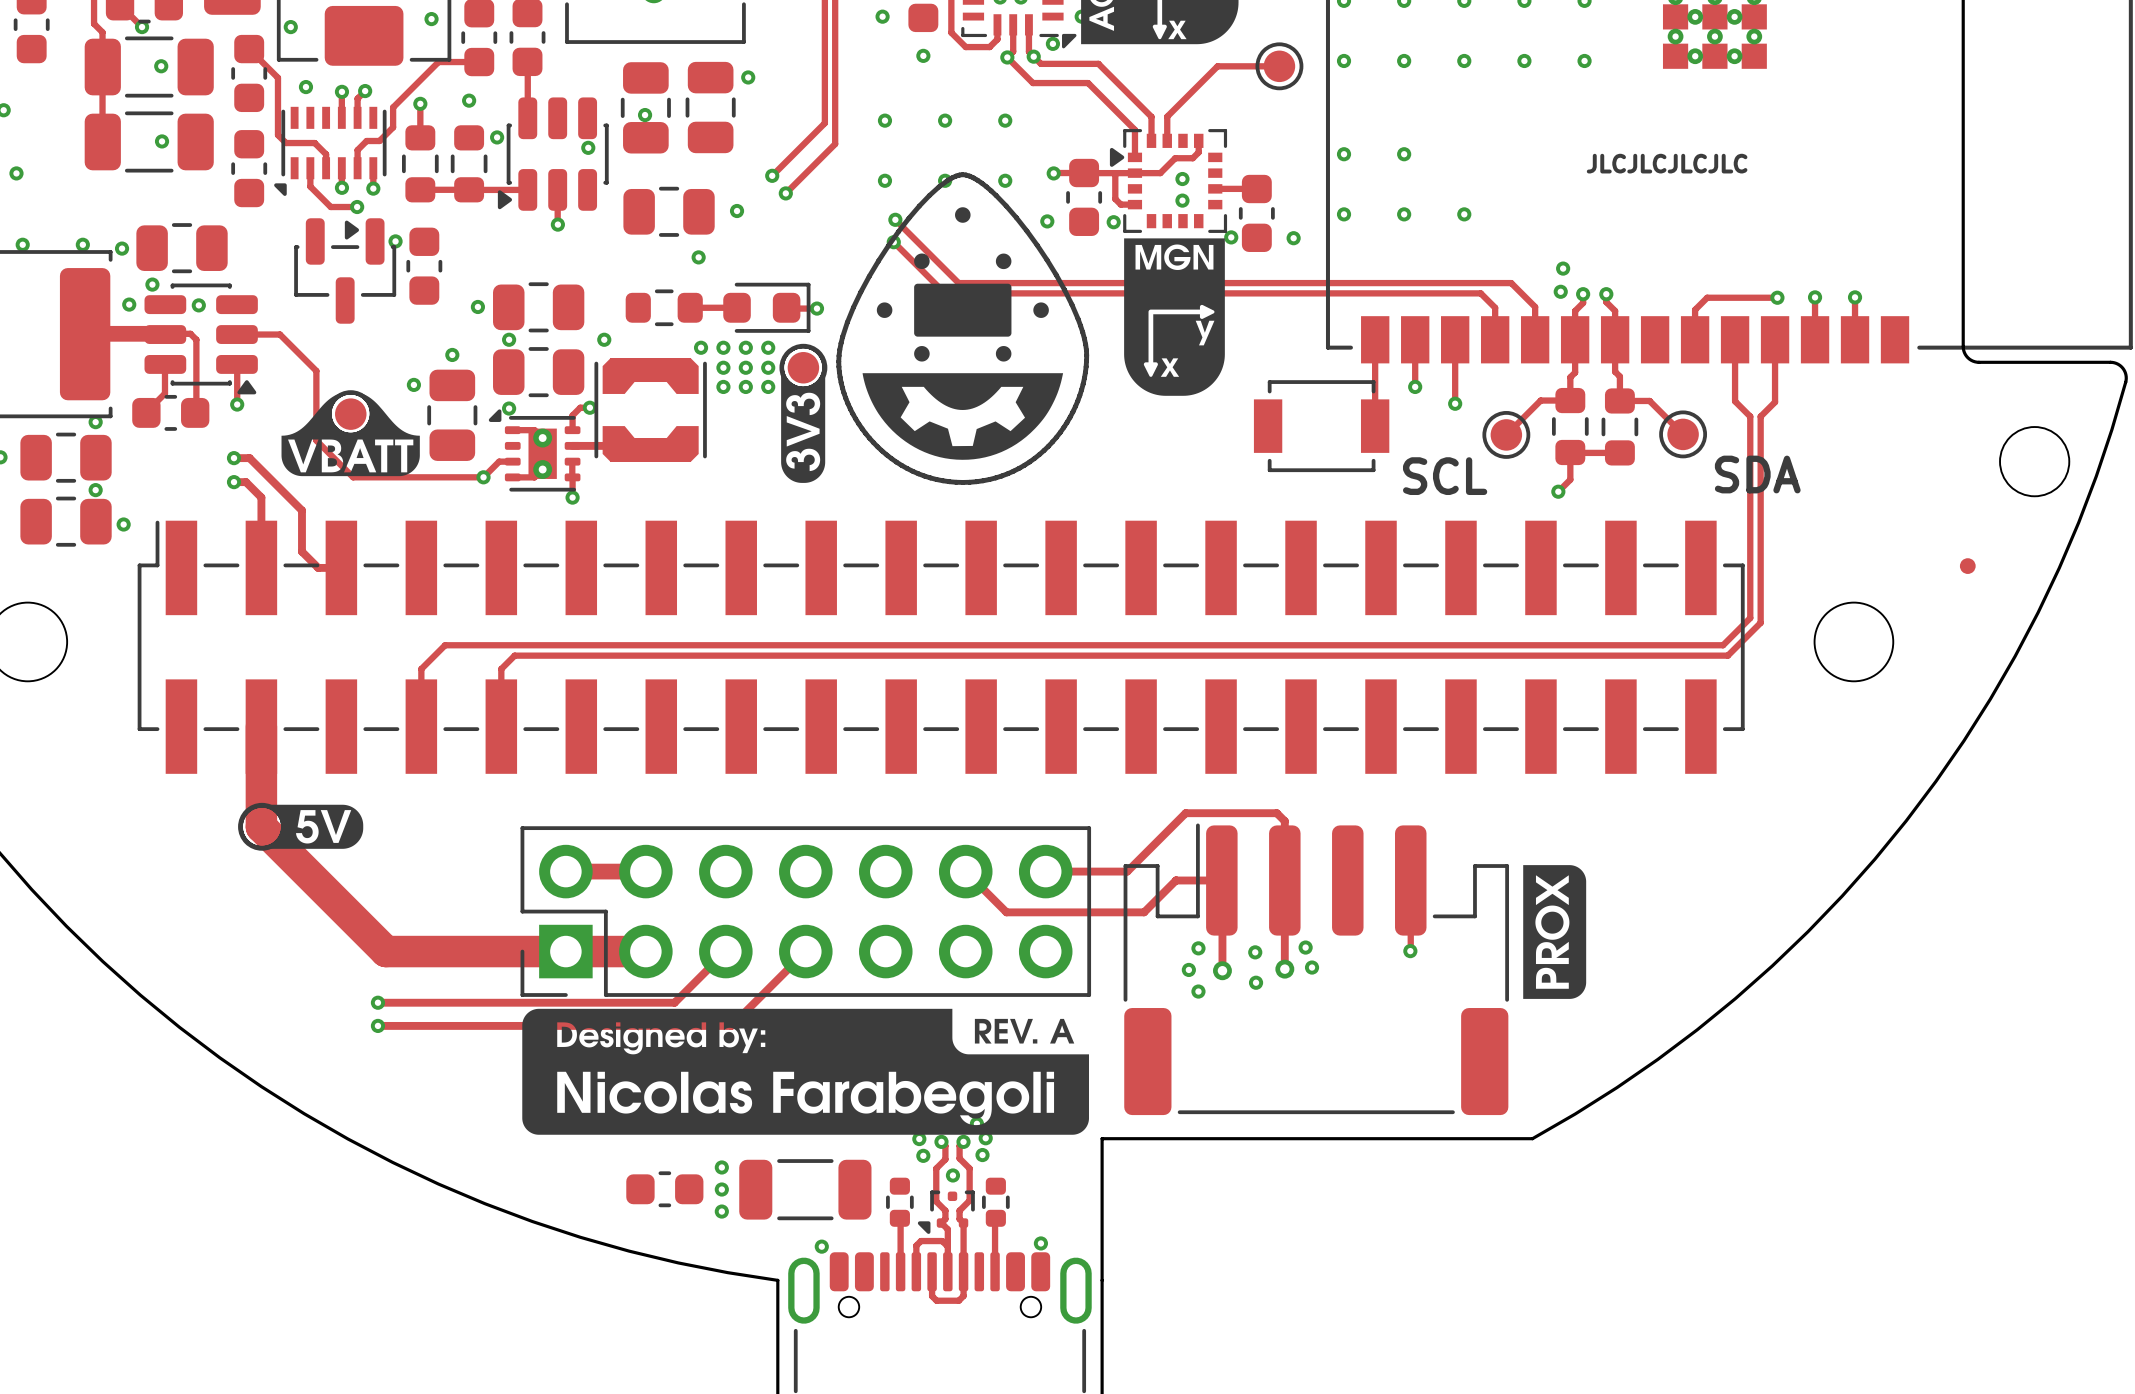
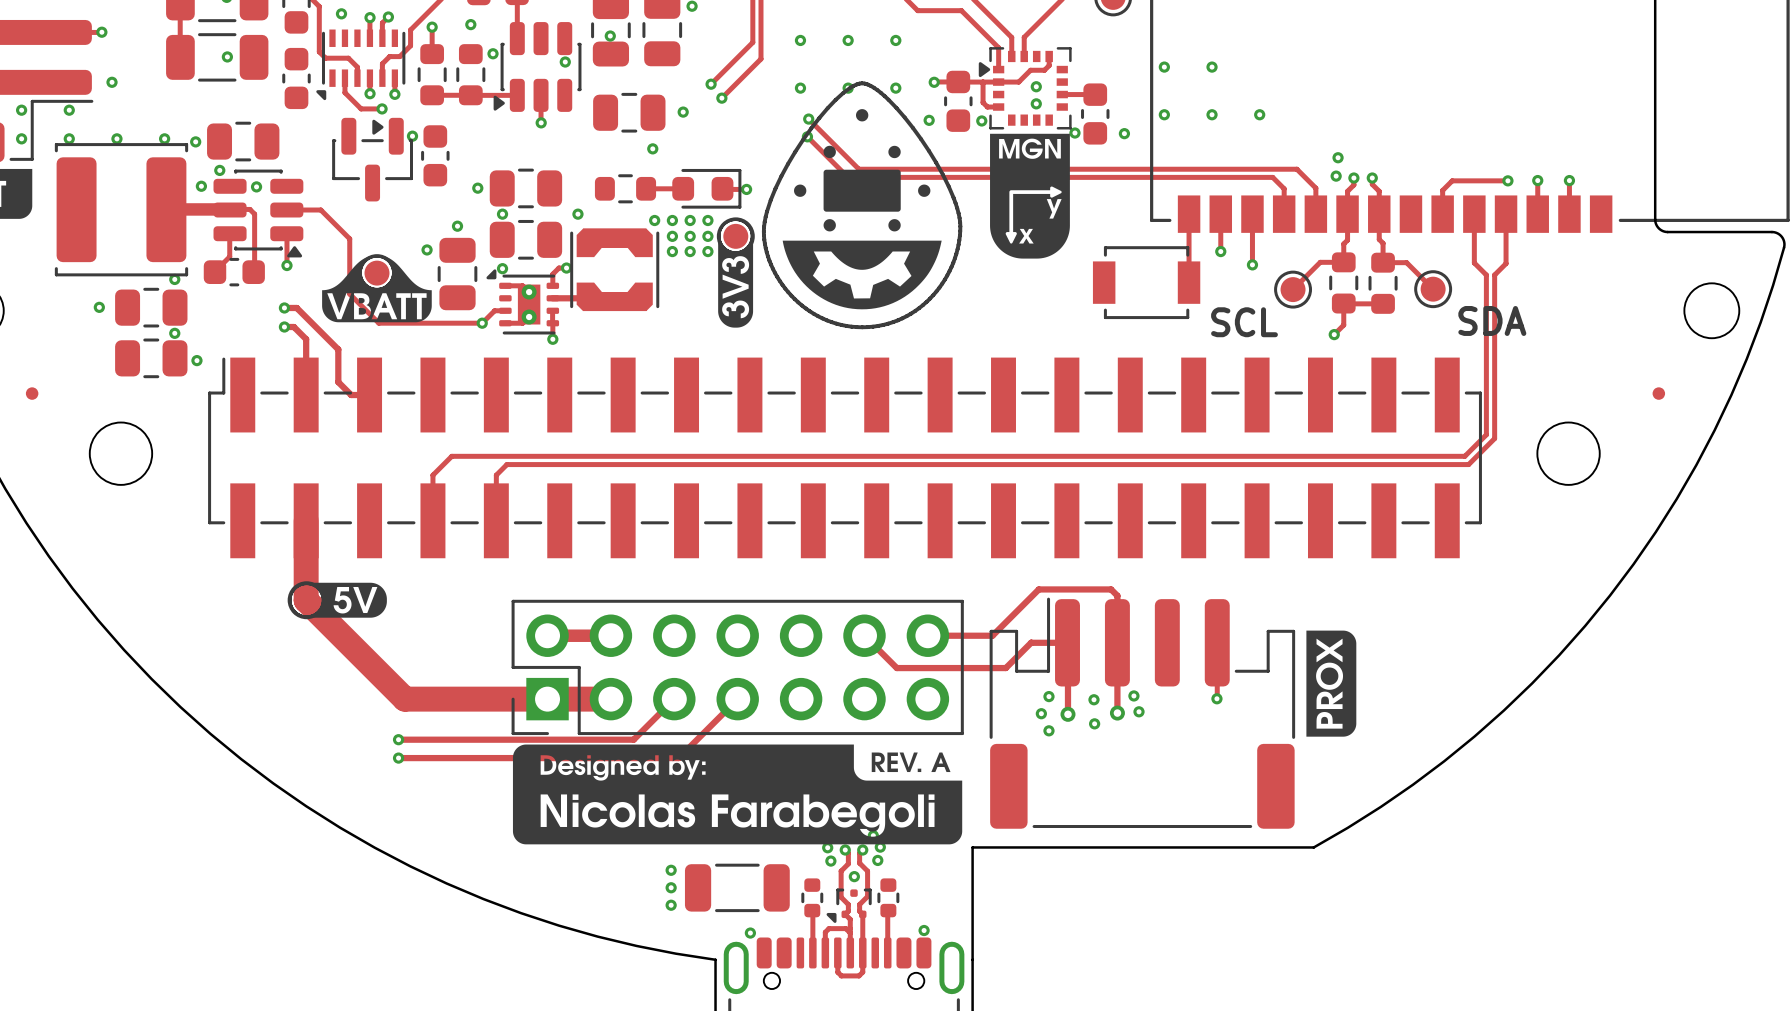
text: JLCJLCJLCJLC (1667, 163) -> none
part: (664, 1189) -> none

